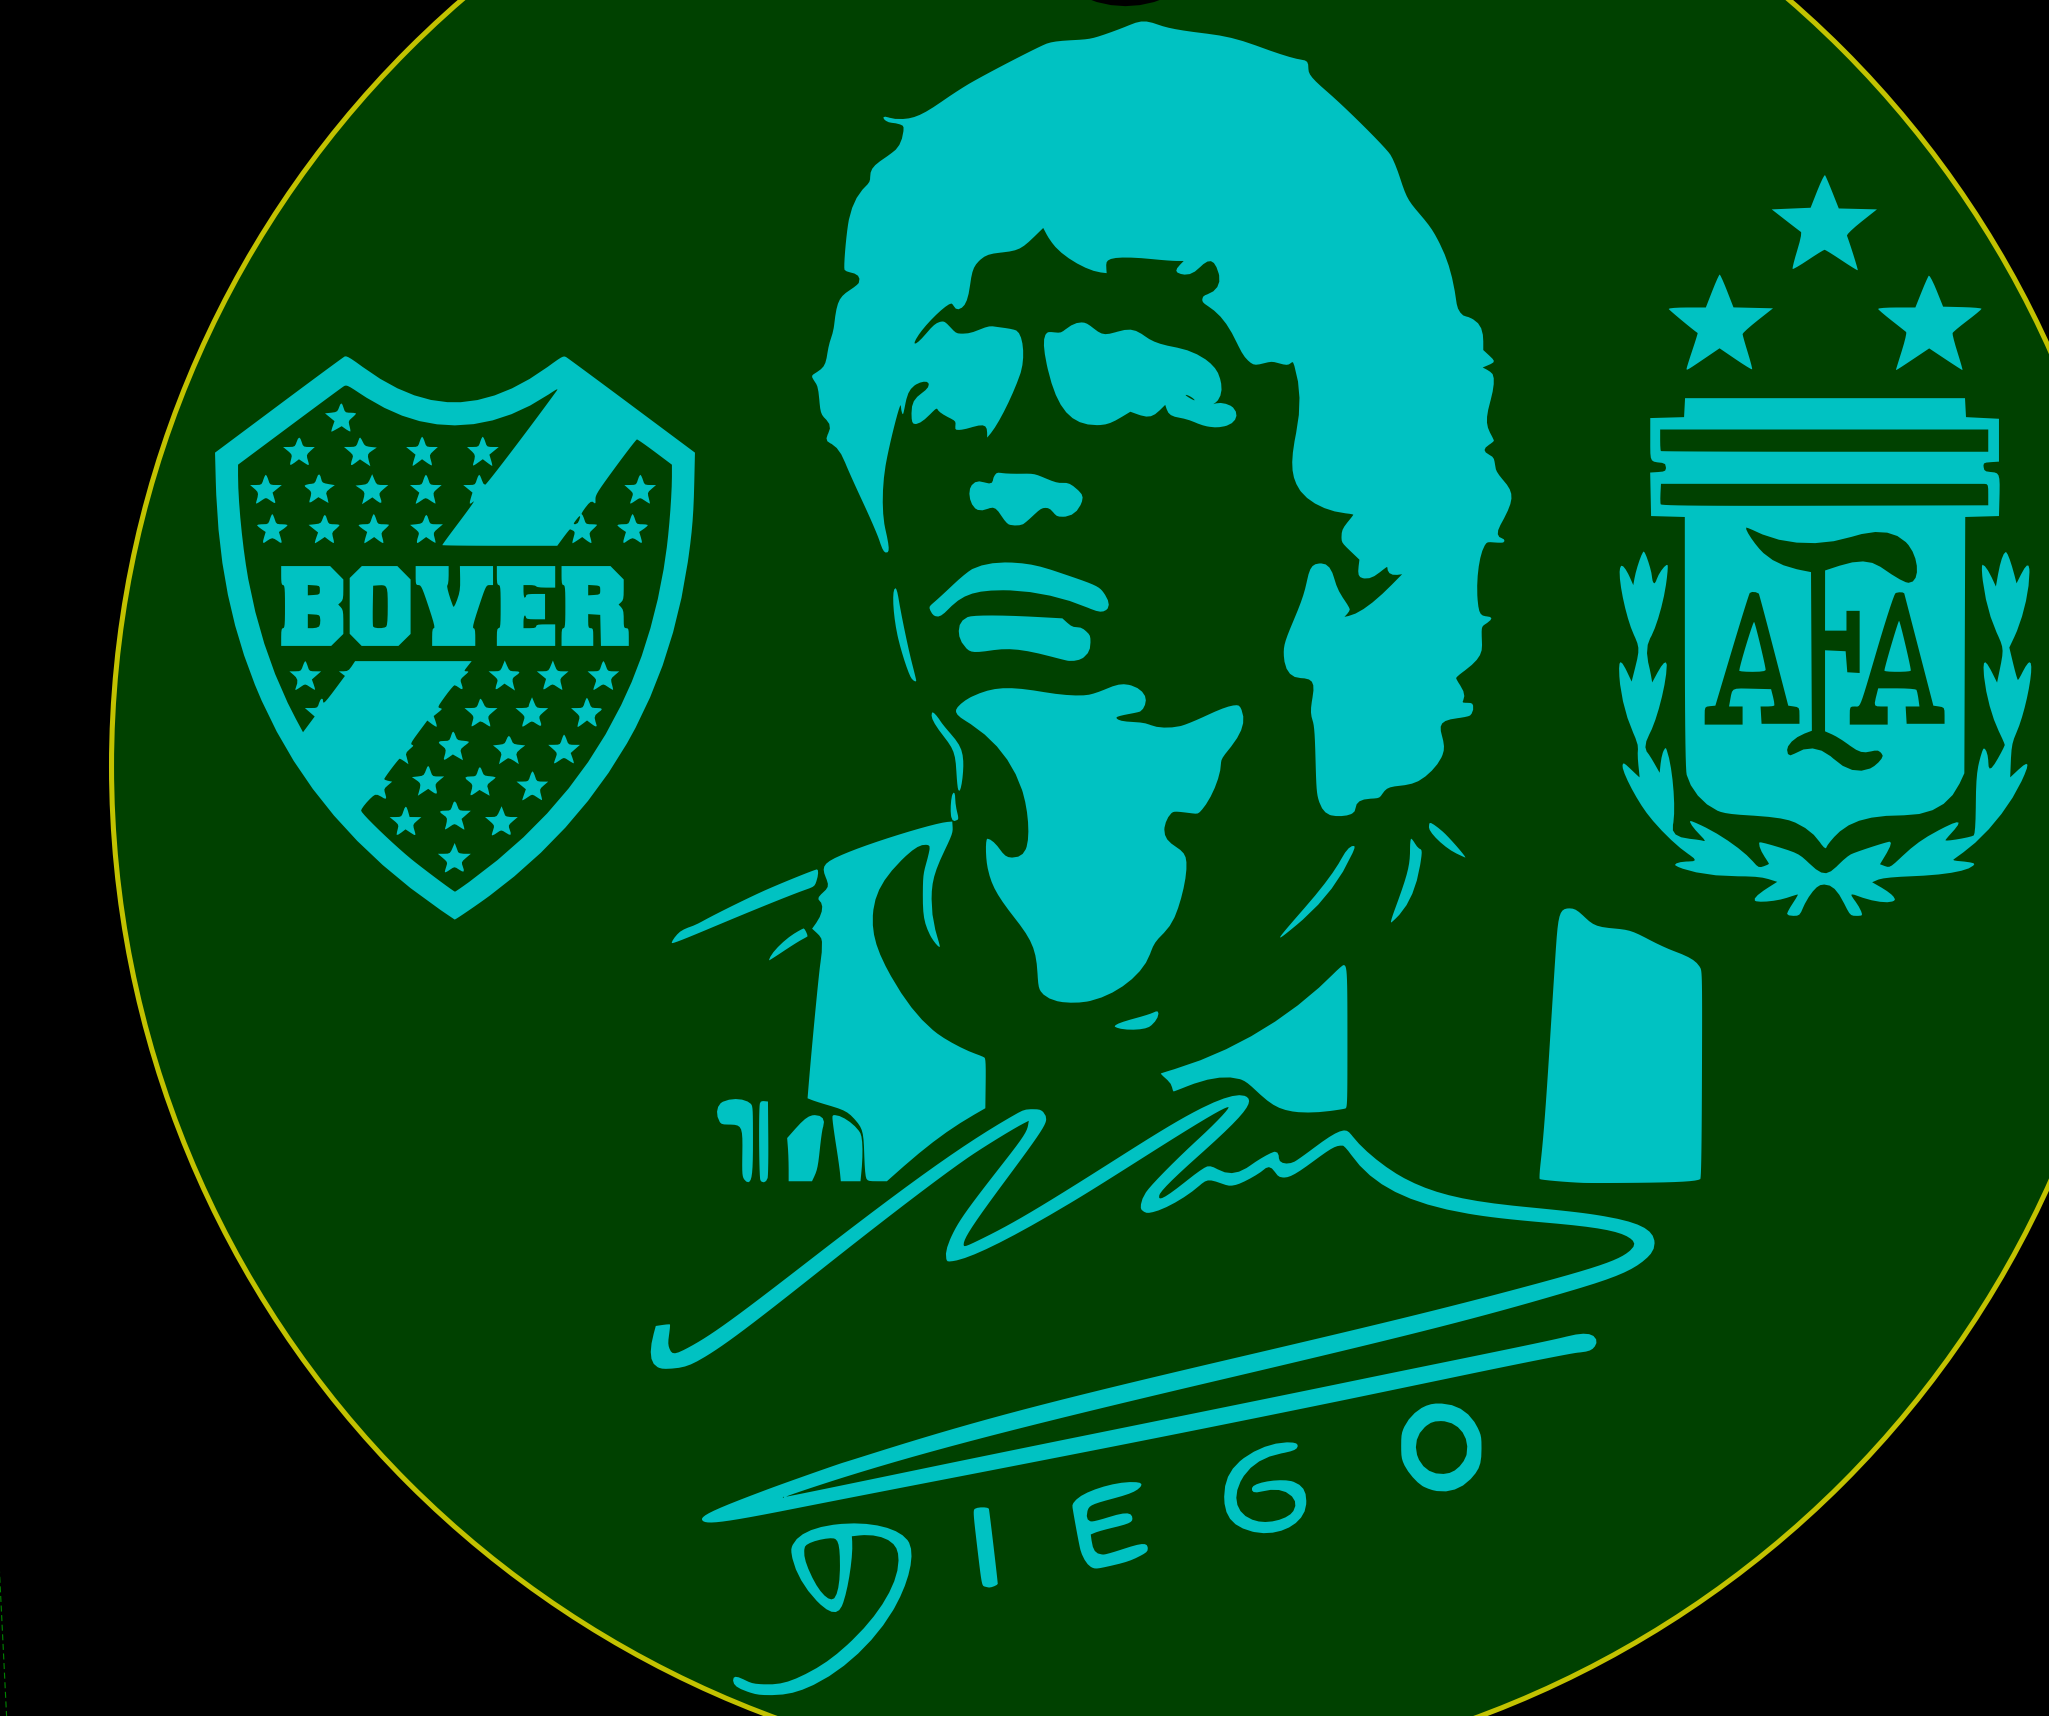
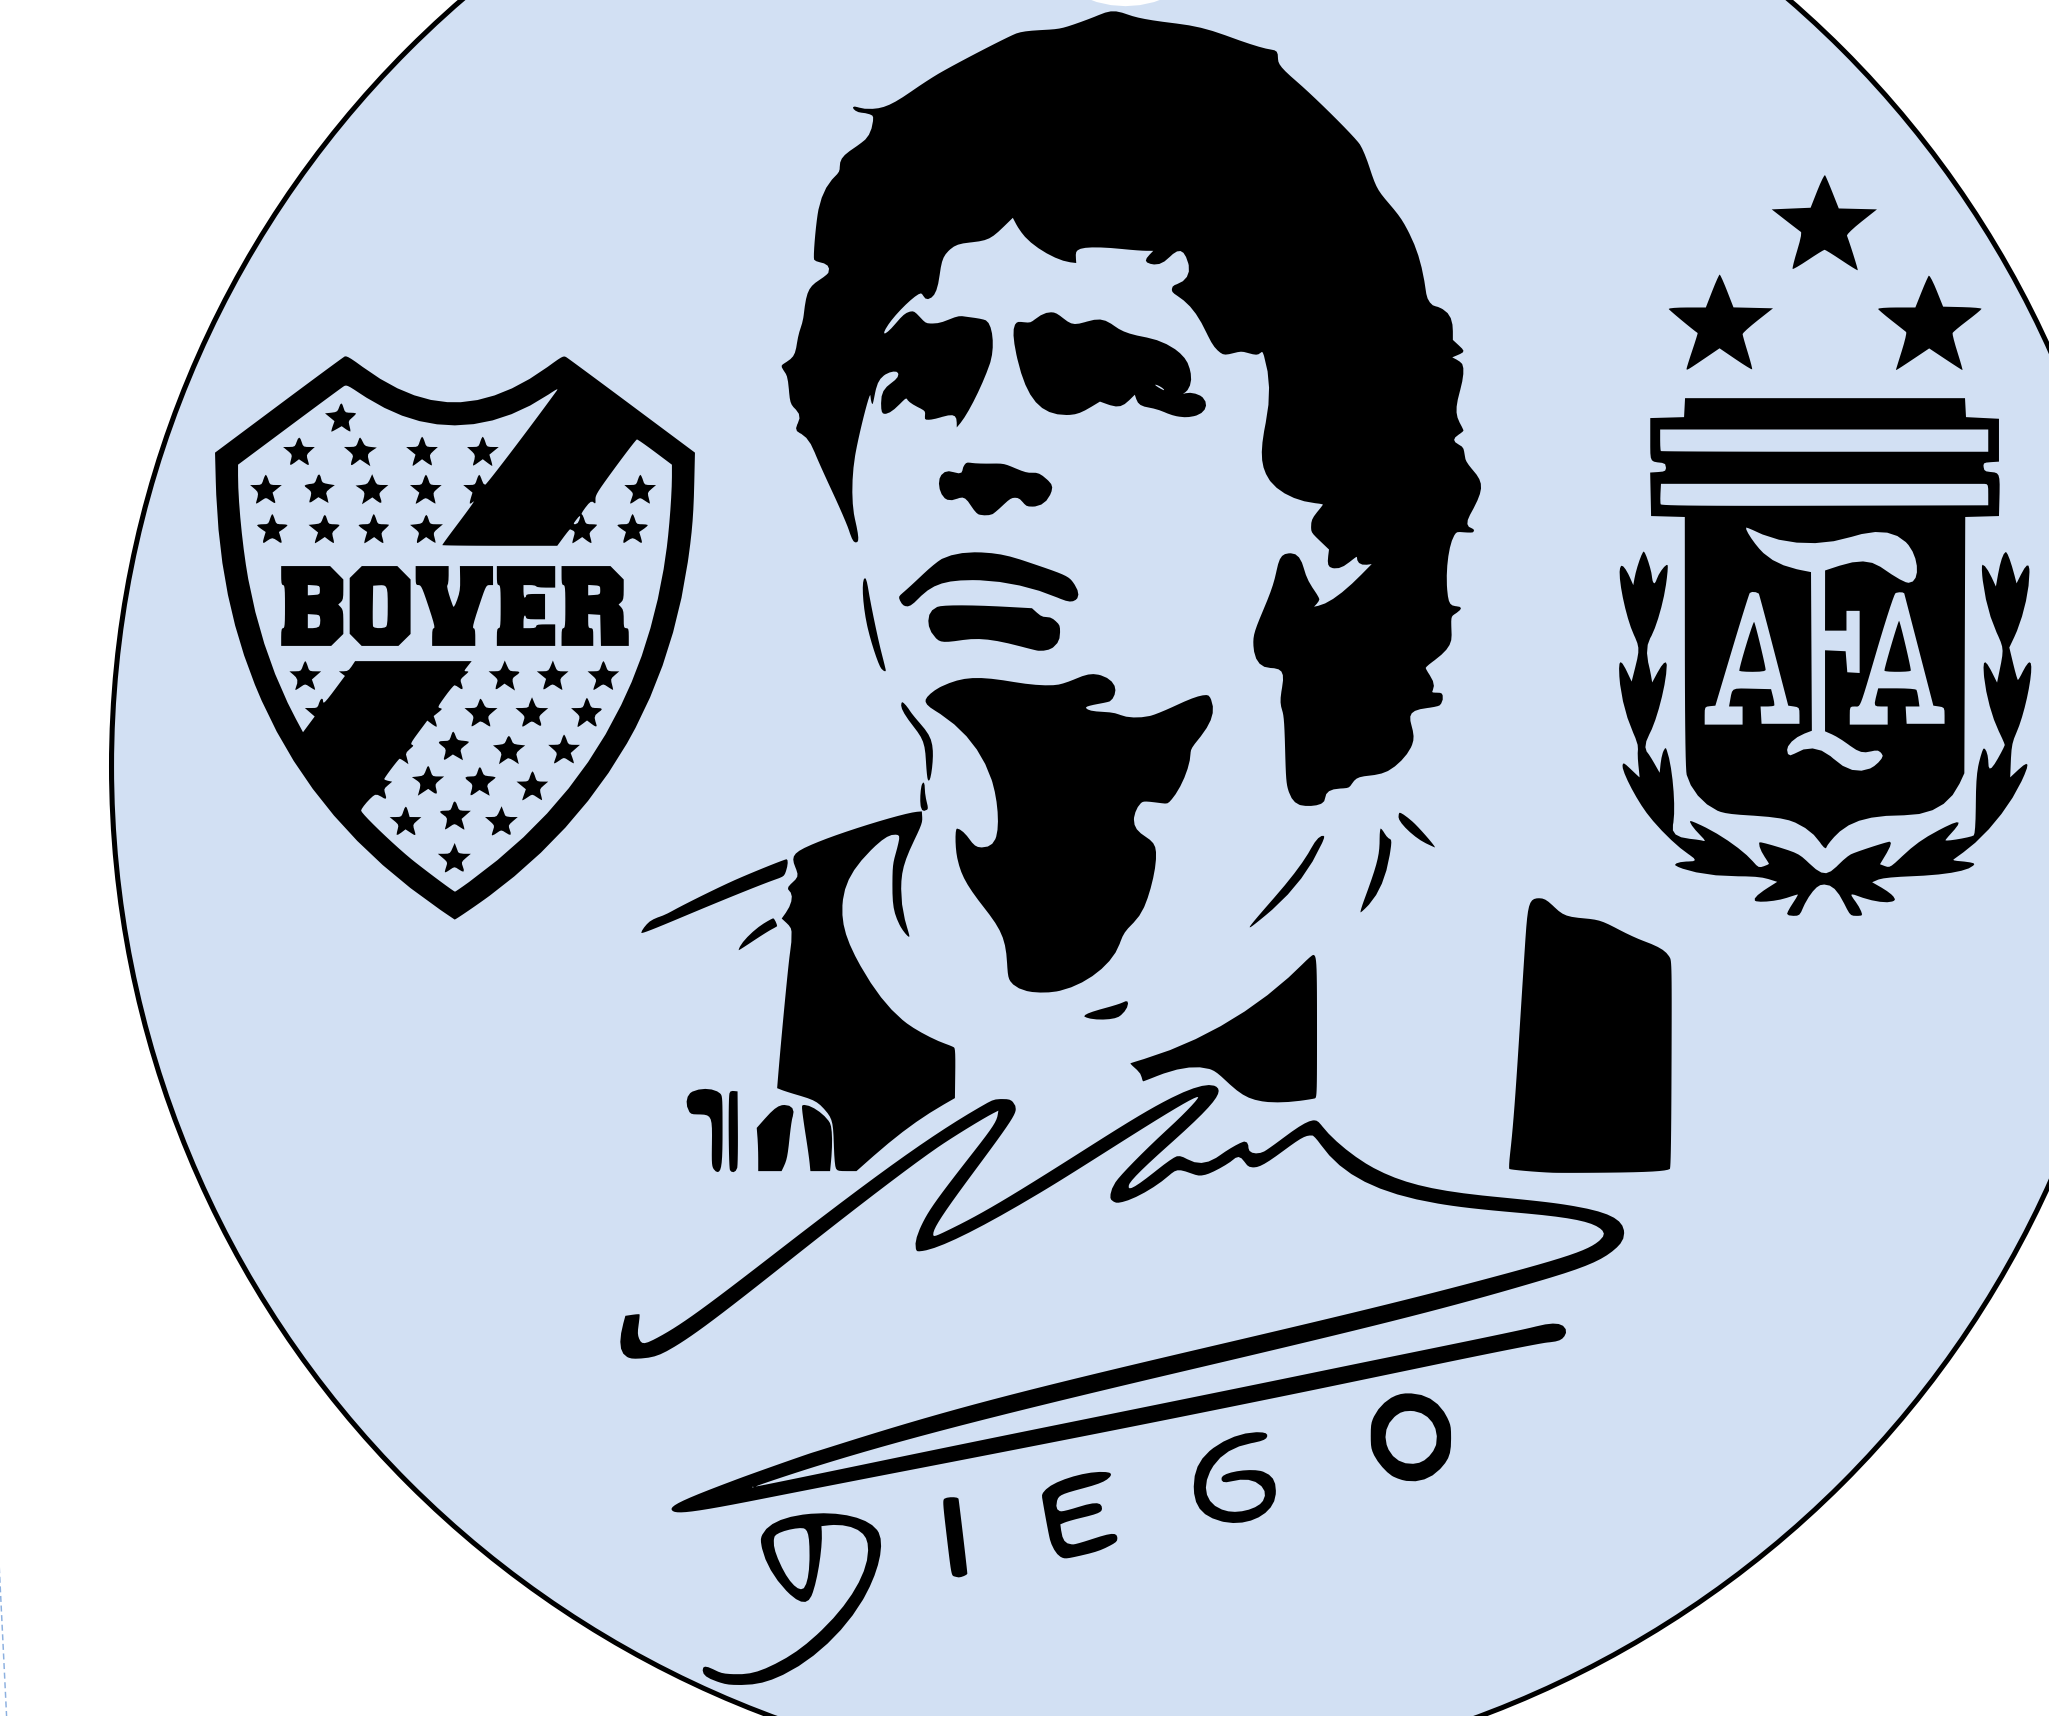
drawing position: (1176, 858) -> (1146, 848)

